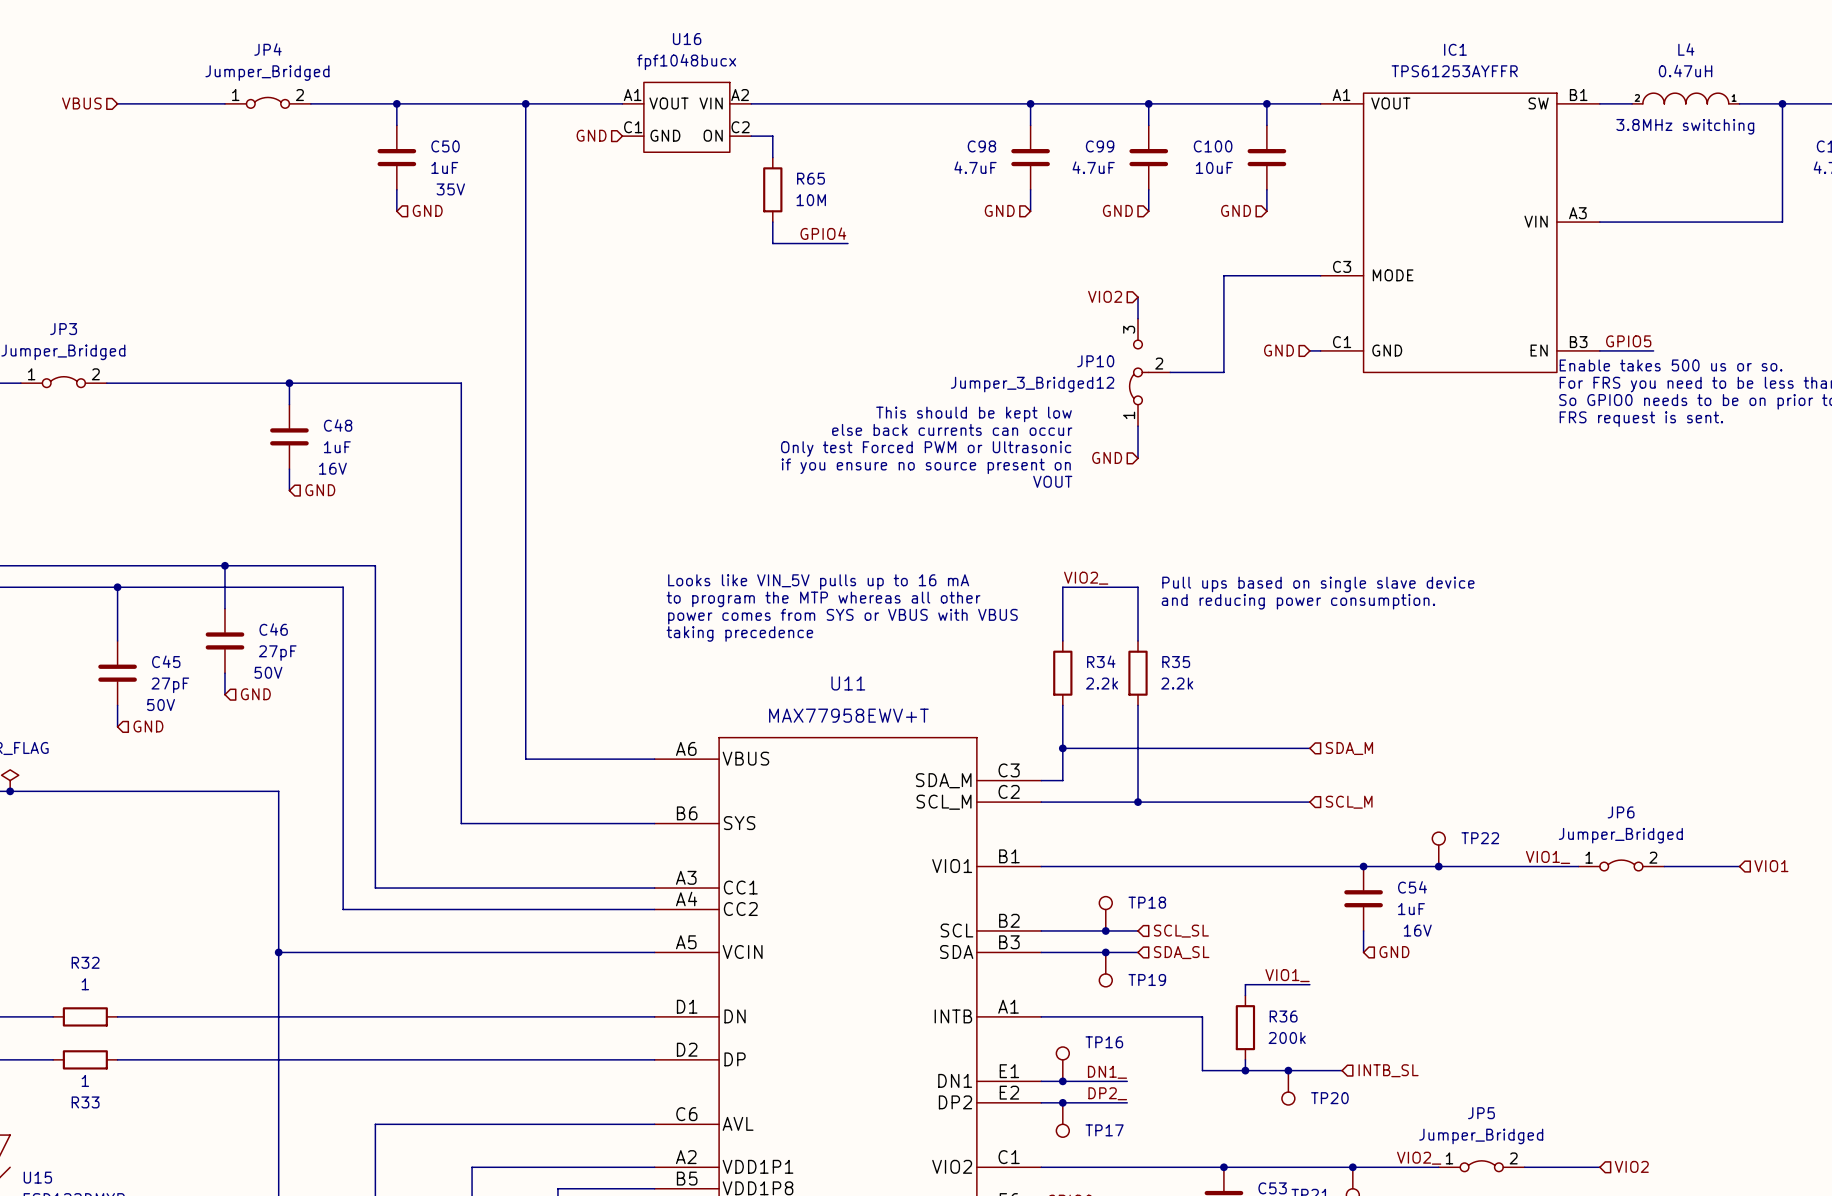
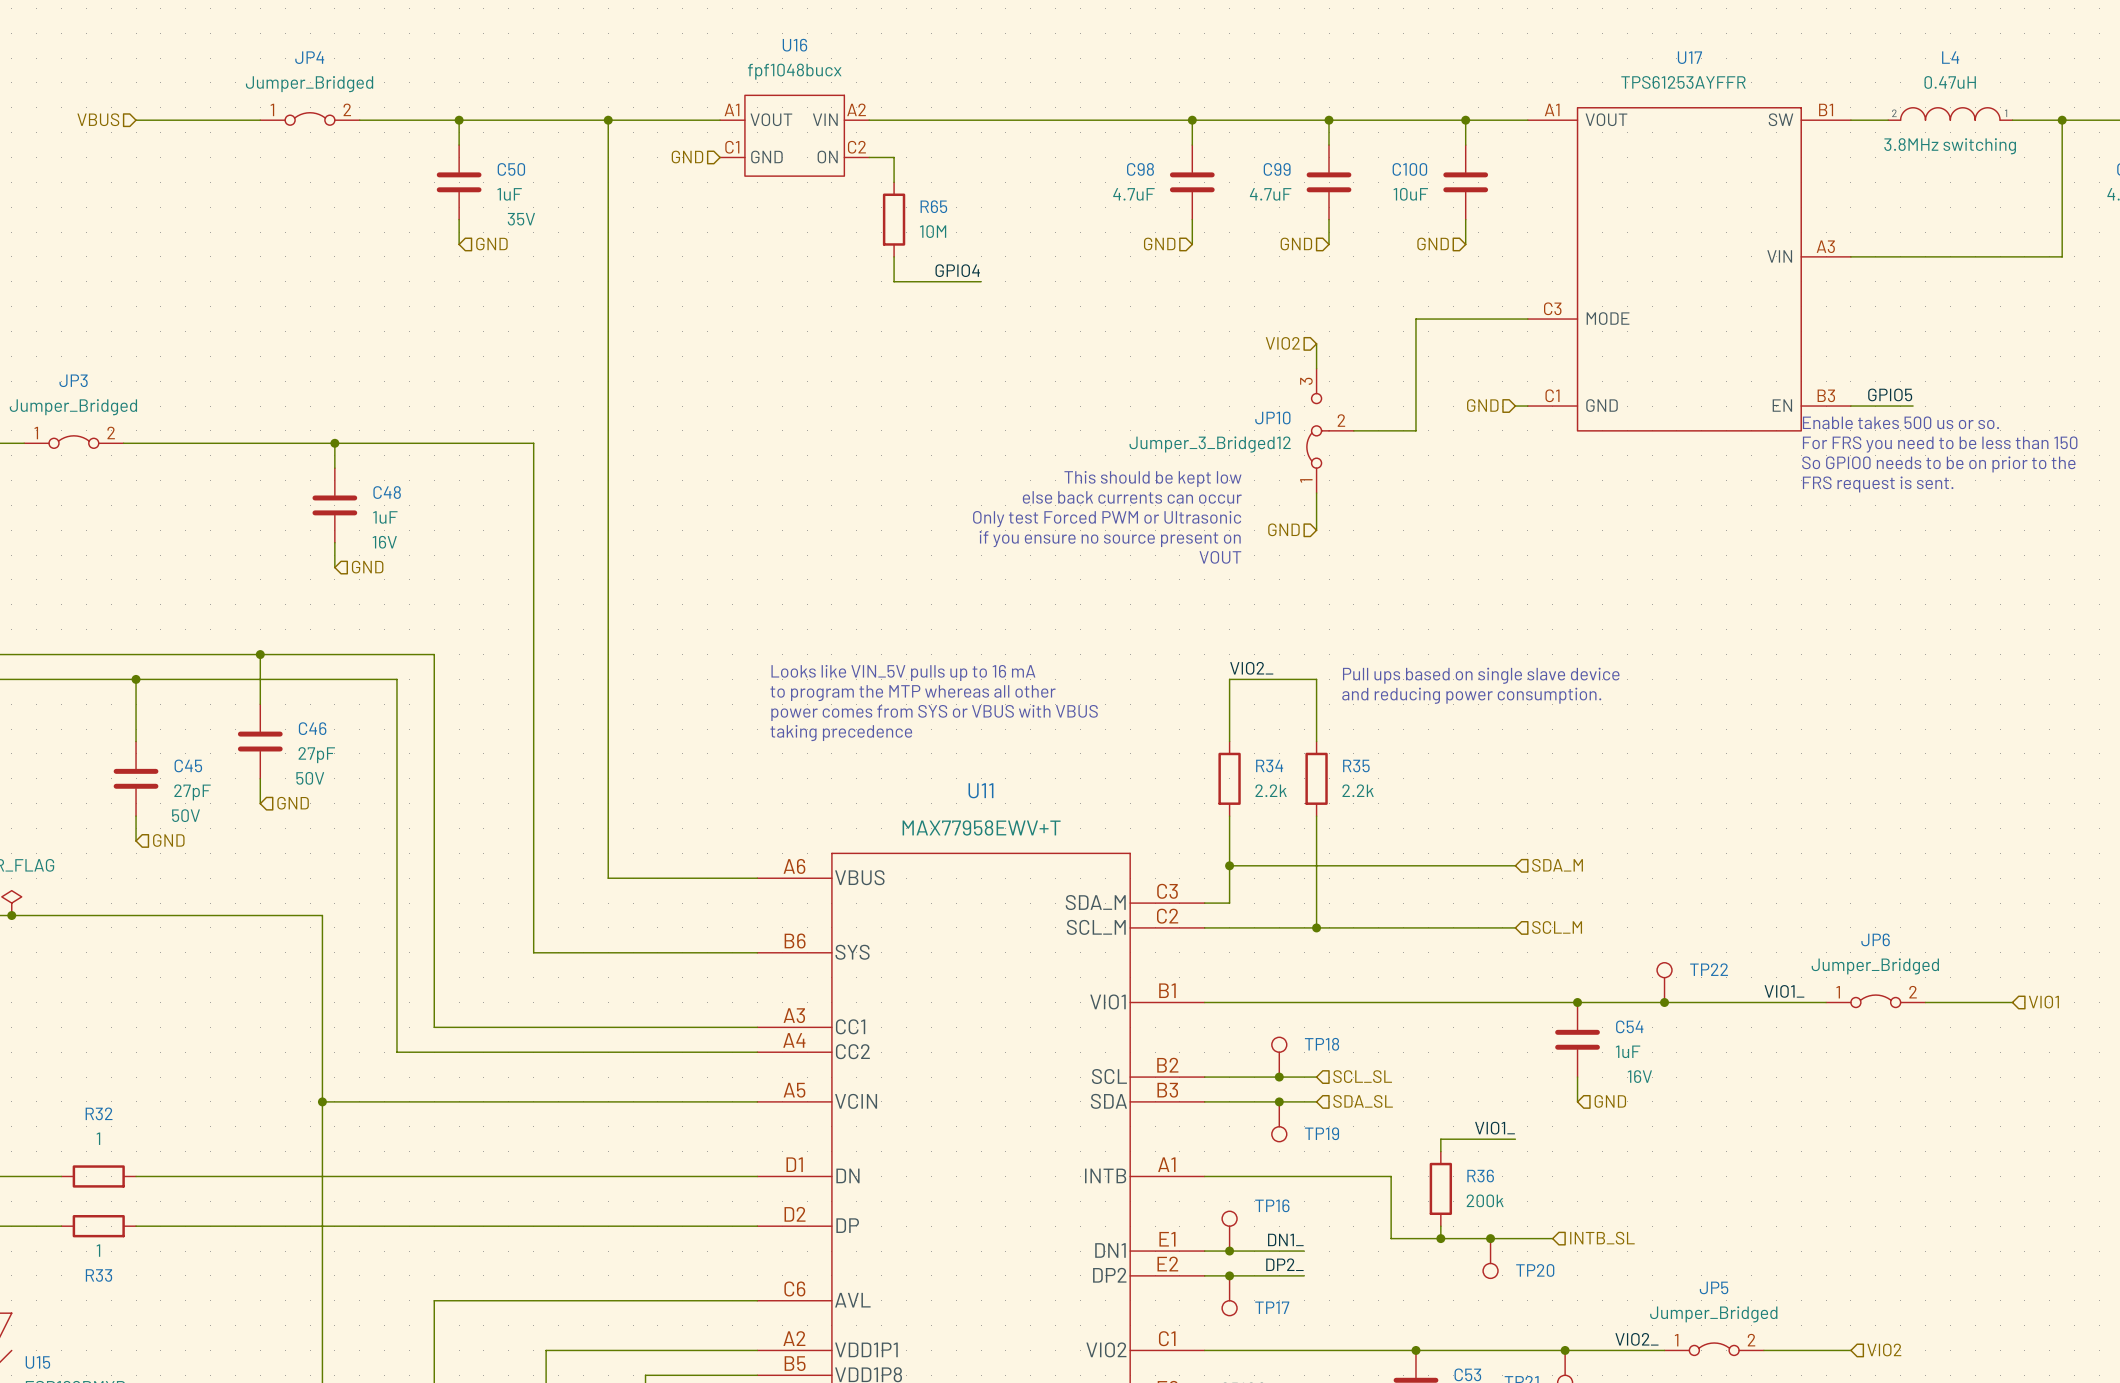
IC1 name: IC1 (1455, 49) -> U17 (1689, 57)

